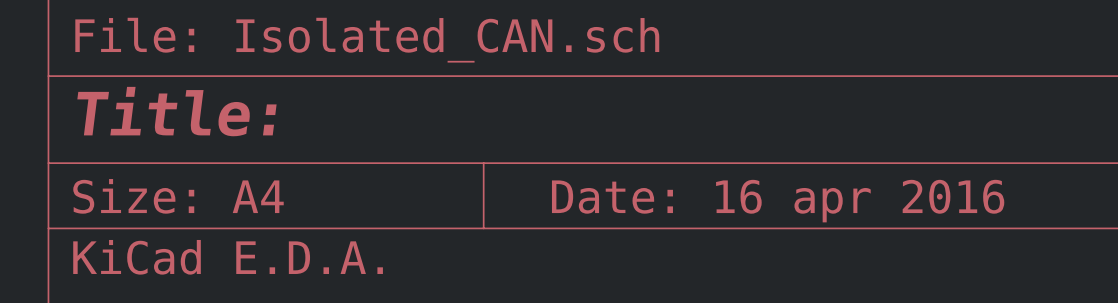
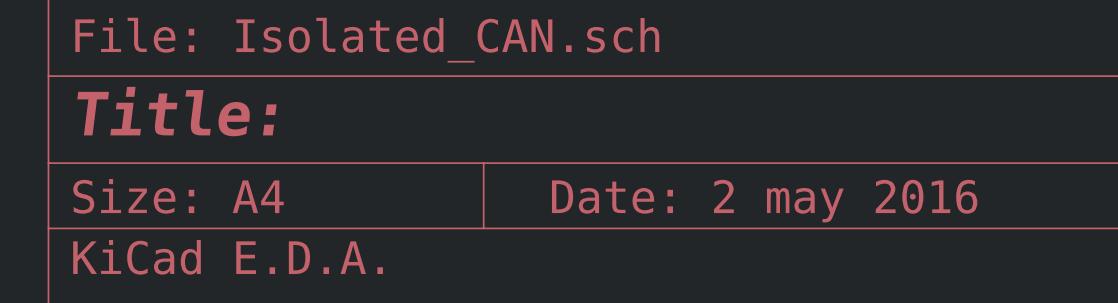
title block: Date: 16 apr 2016 (778, 201) -> Date: 2 may 2016 (764, 201)

